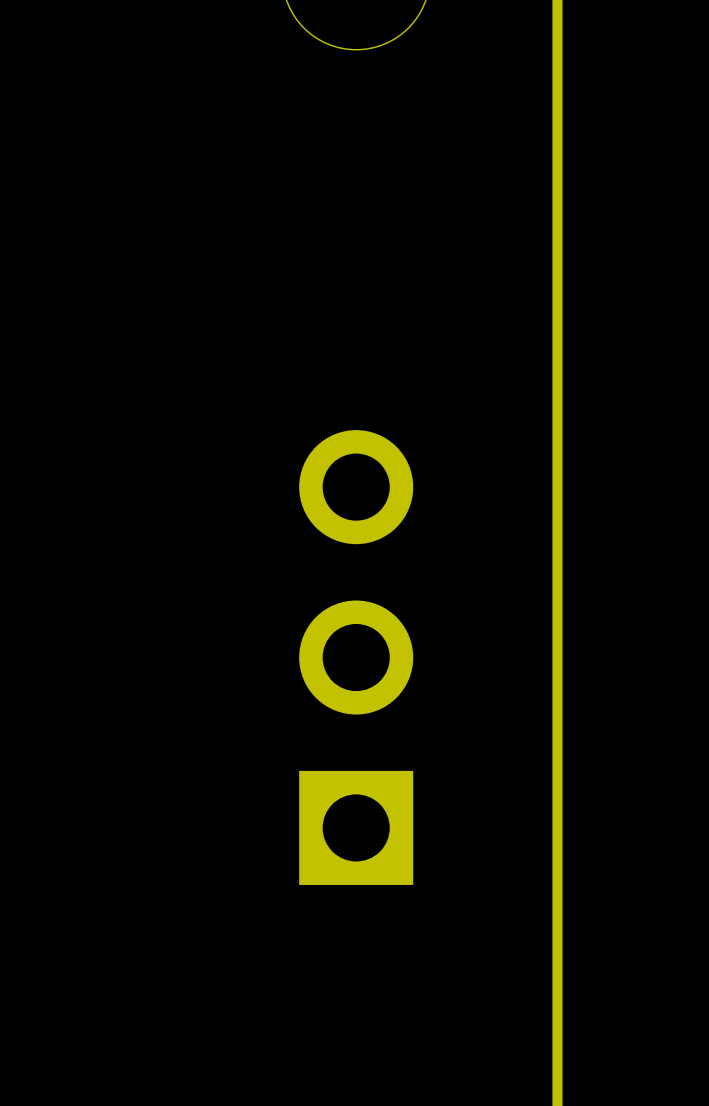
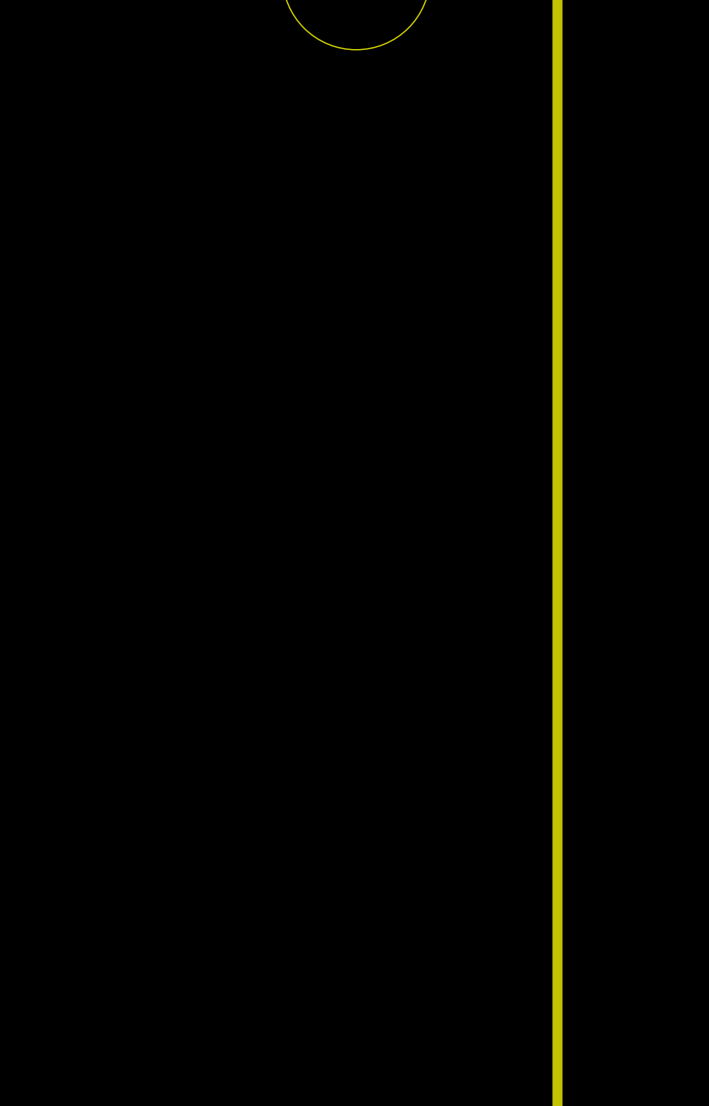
part: (356, 657) -> none

